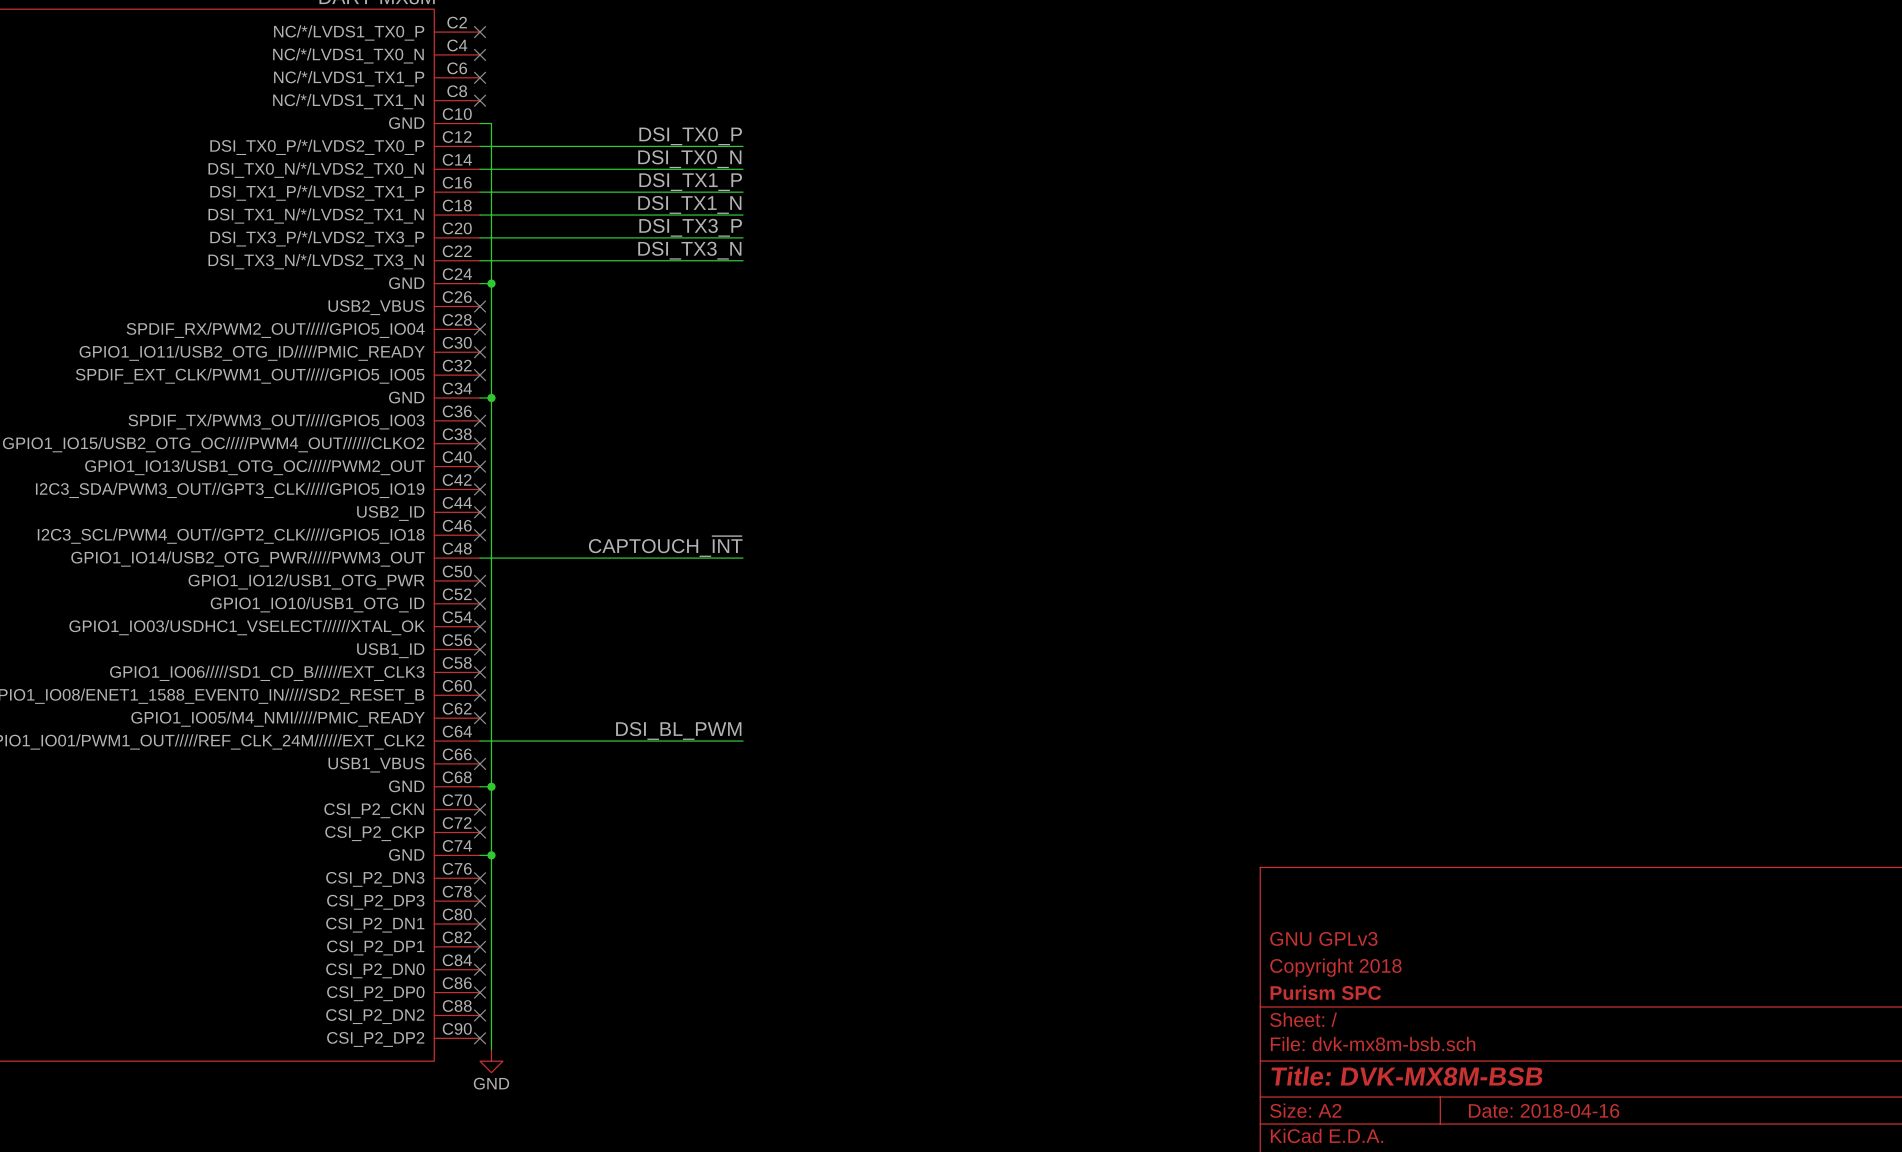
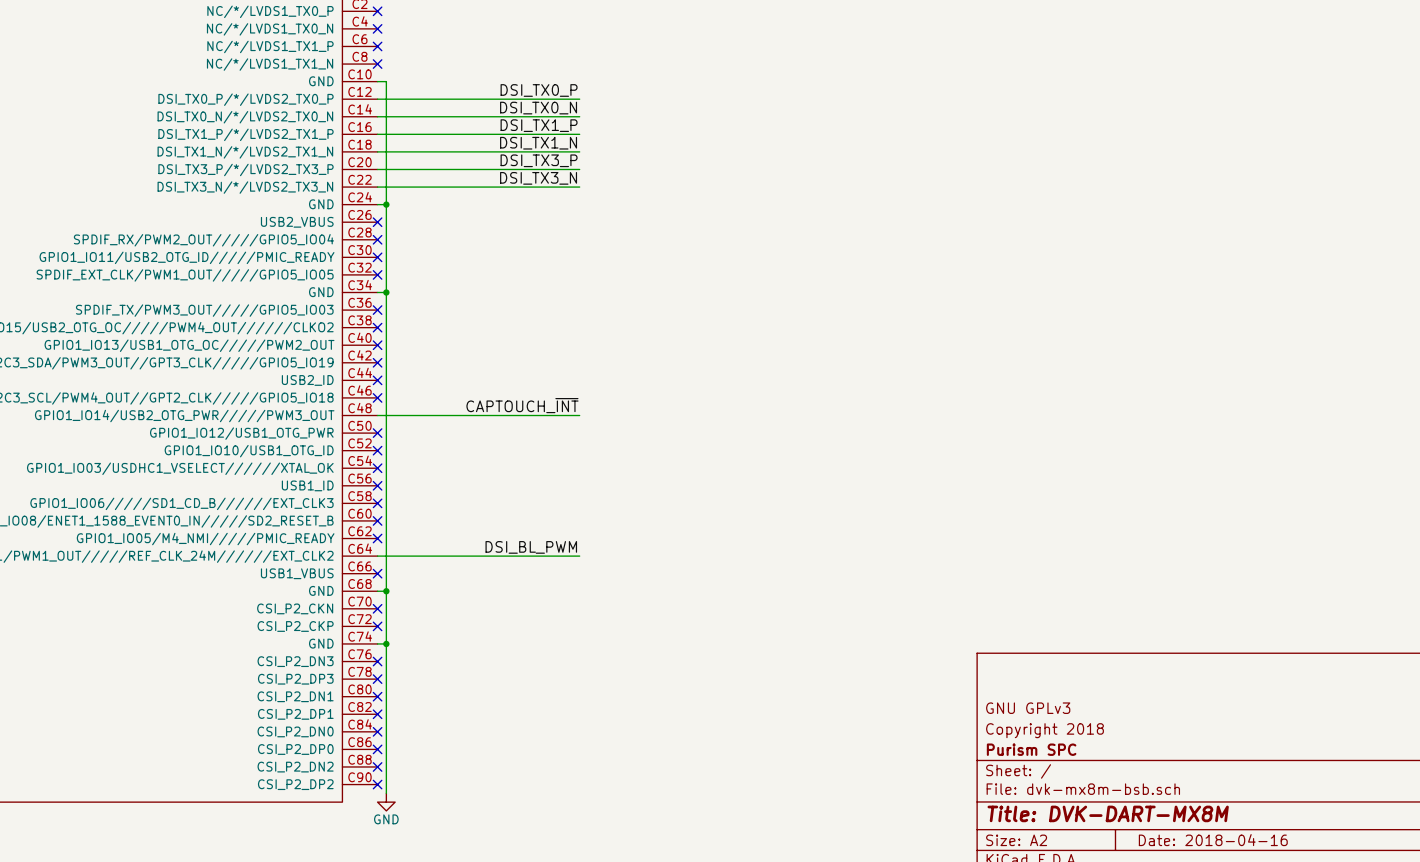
title block: Title: DVK-MX8M-BSB (1406, 1076) -> Title: DVK-DART-MX8M (1108, 813)

